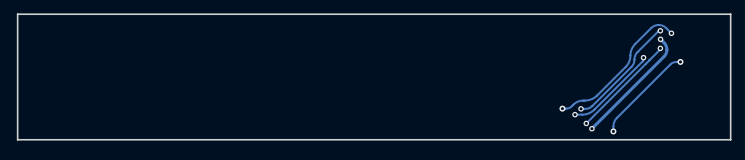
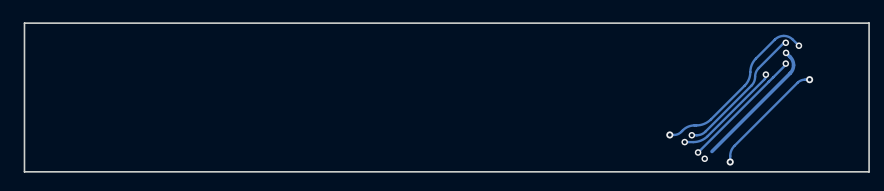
track: (598, 122) (591, 128) -> none

